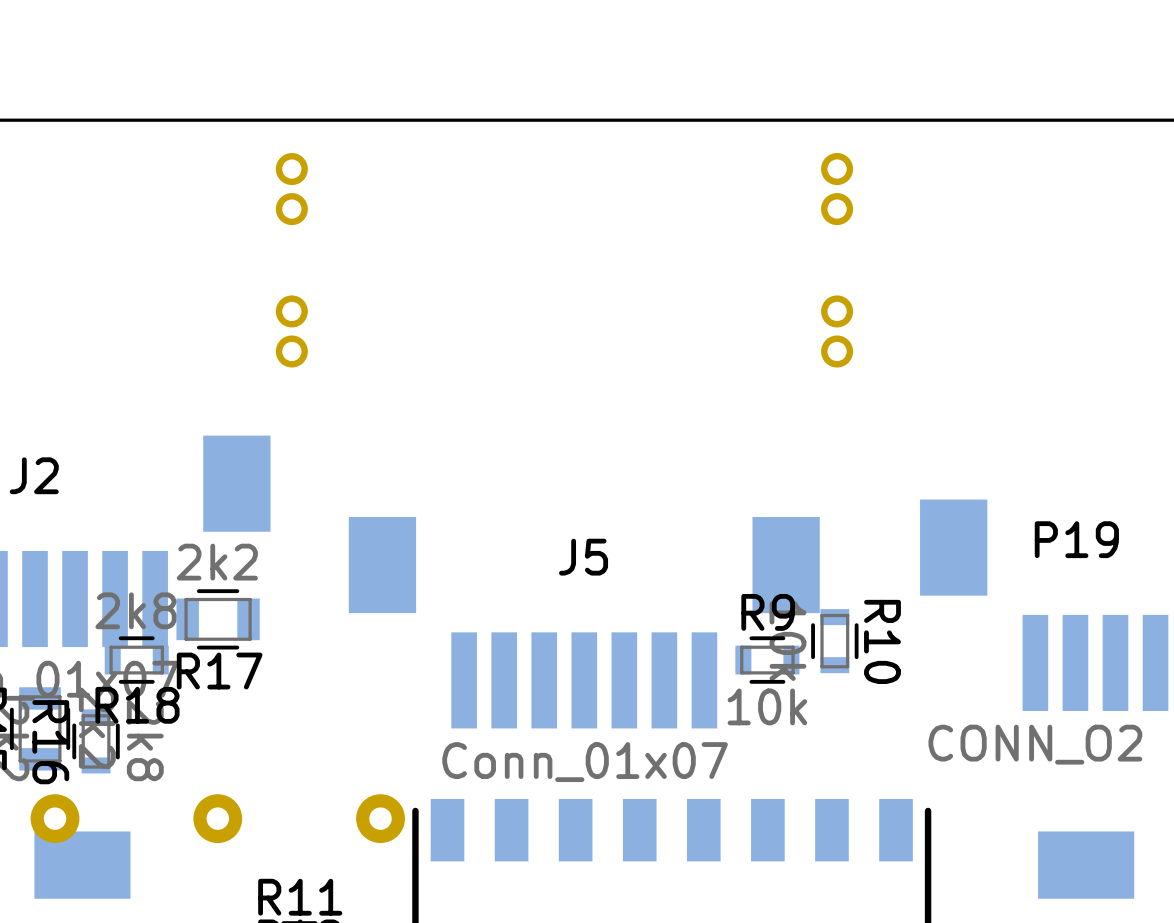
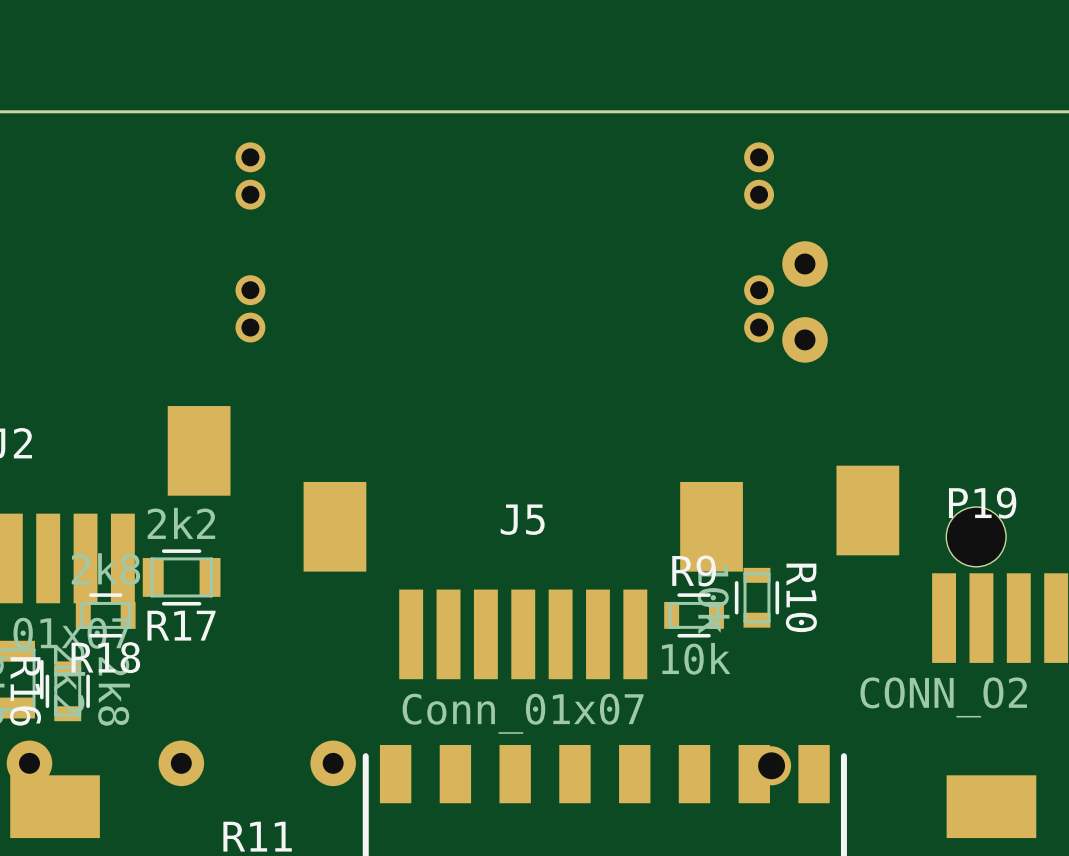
part: none -> (804, 301)
part: none -> (976, 536)
part: none -> (771, 765)

